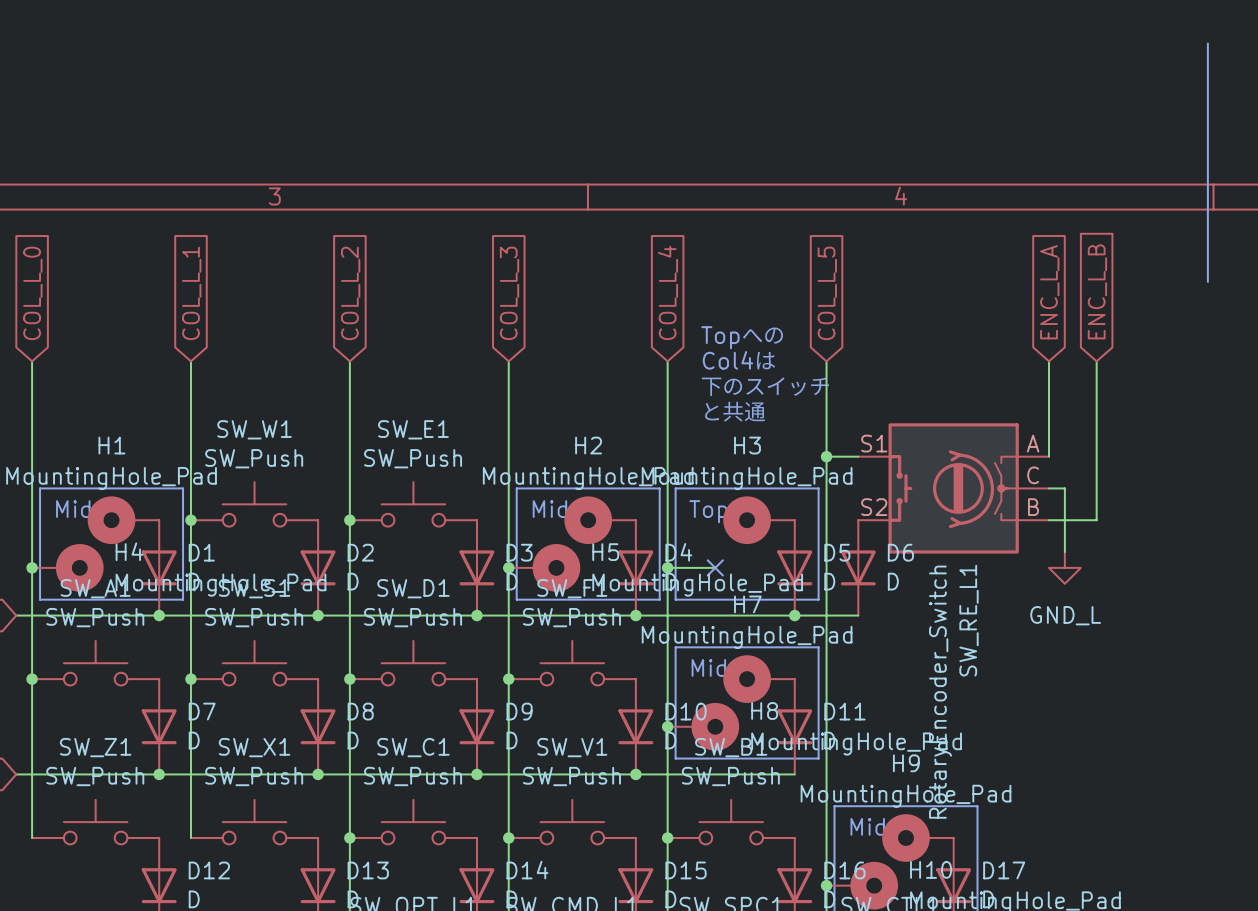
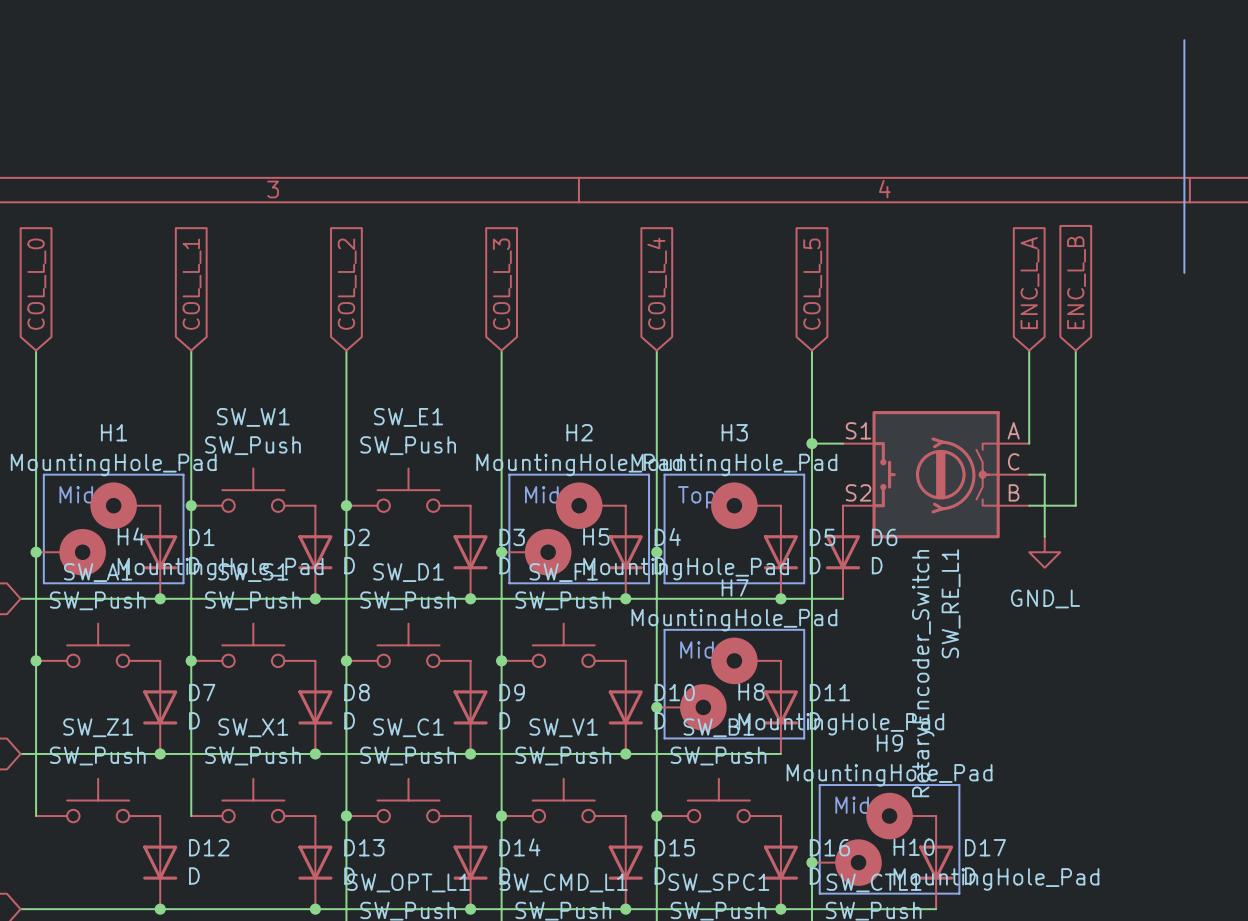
text: Topへの (742, 337) -> none
text: Col4は (739, 360) -> none
text: 下のスイッチ (765, 386) -> none
text: と共通 (735, 411) -> none
wire: (667, 567) (715, 567) -> none
no-connect mark: (715, 567) -> none

